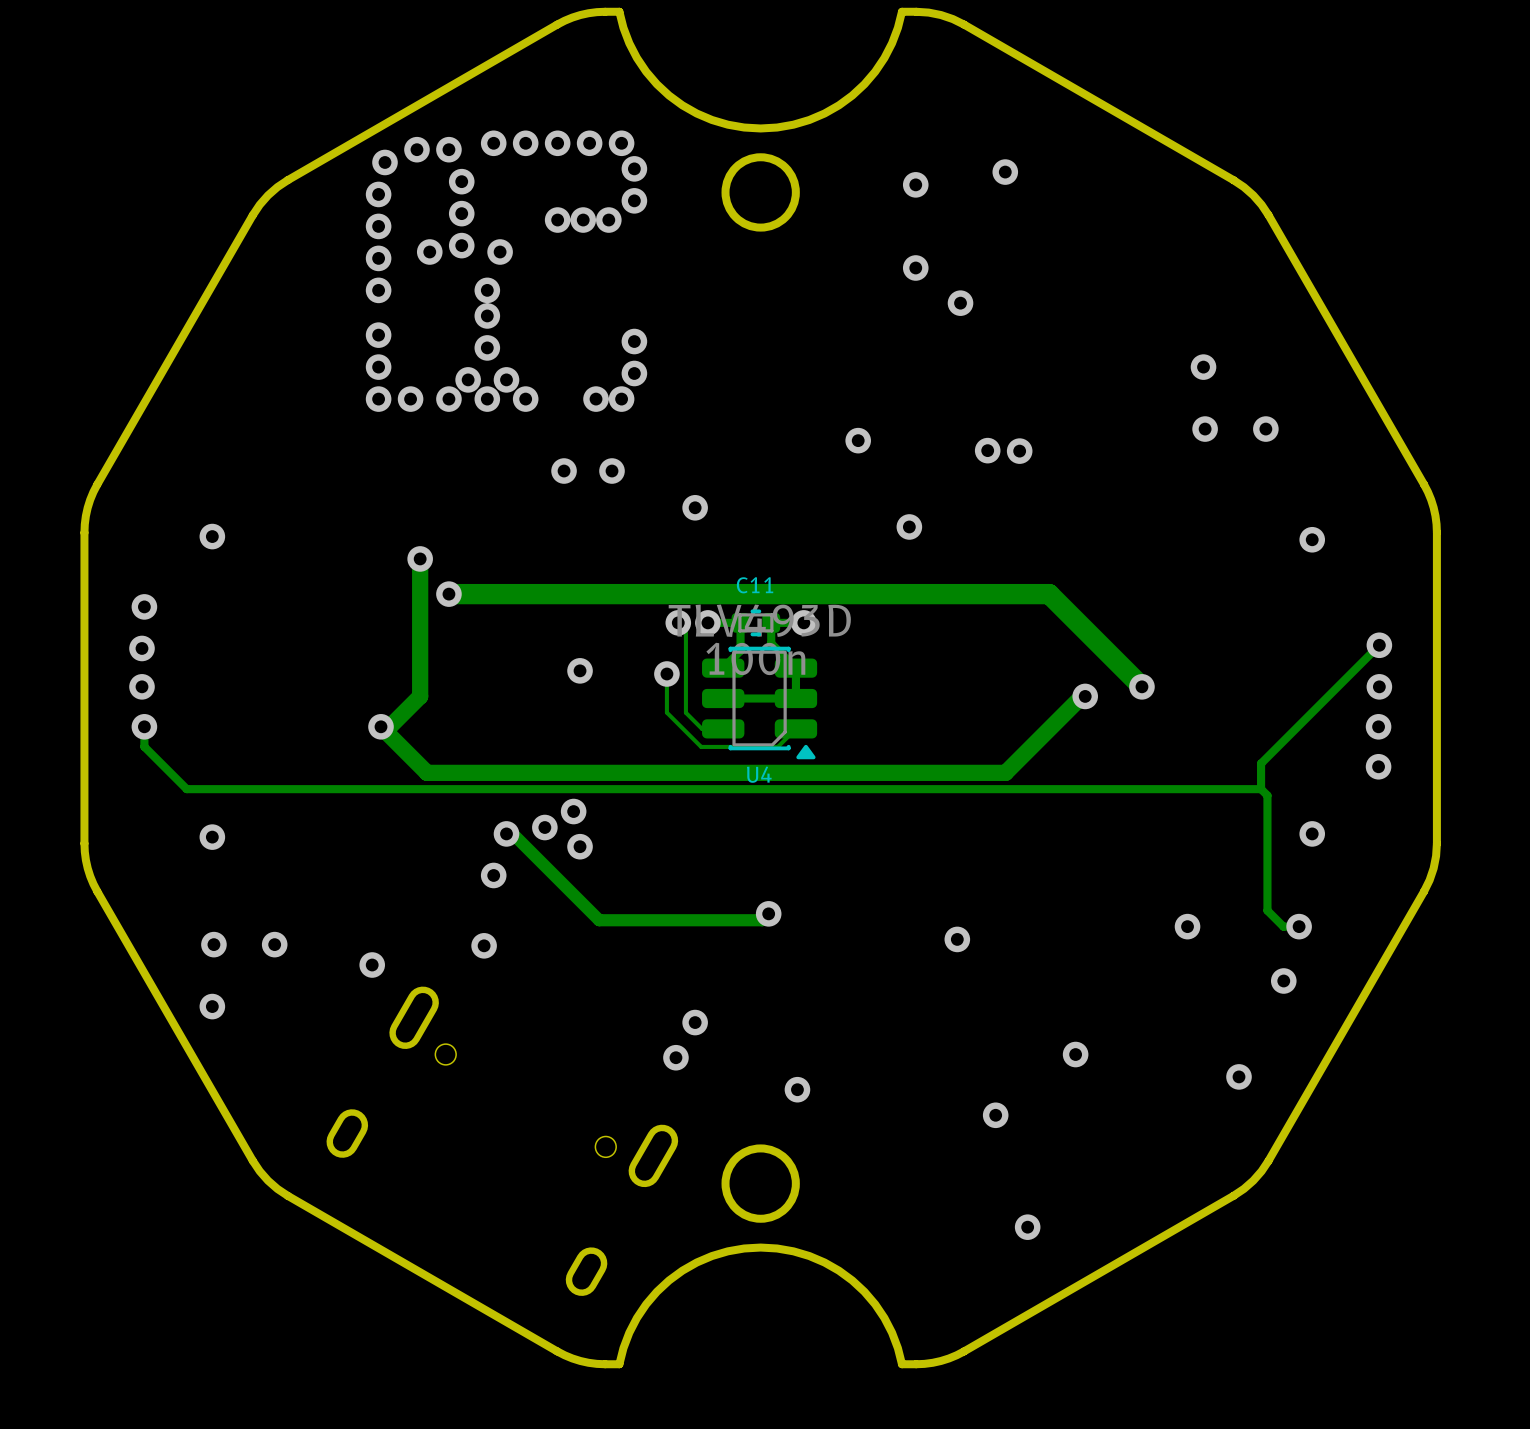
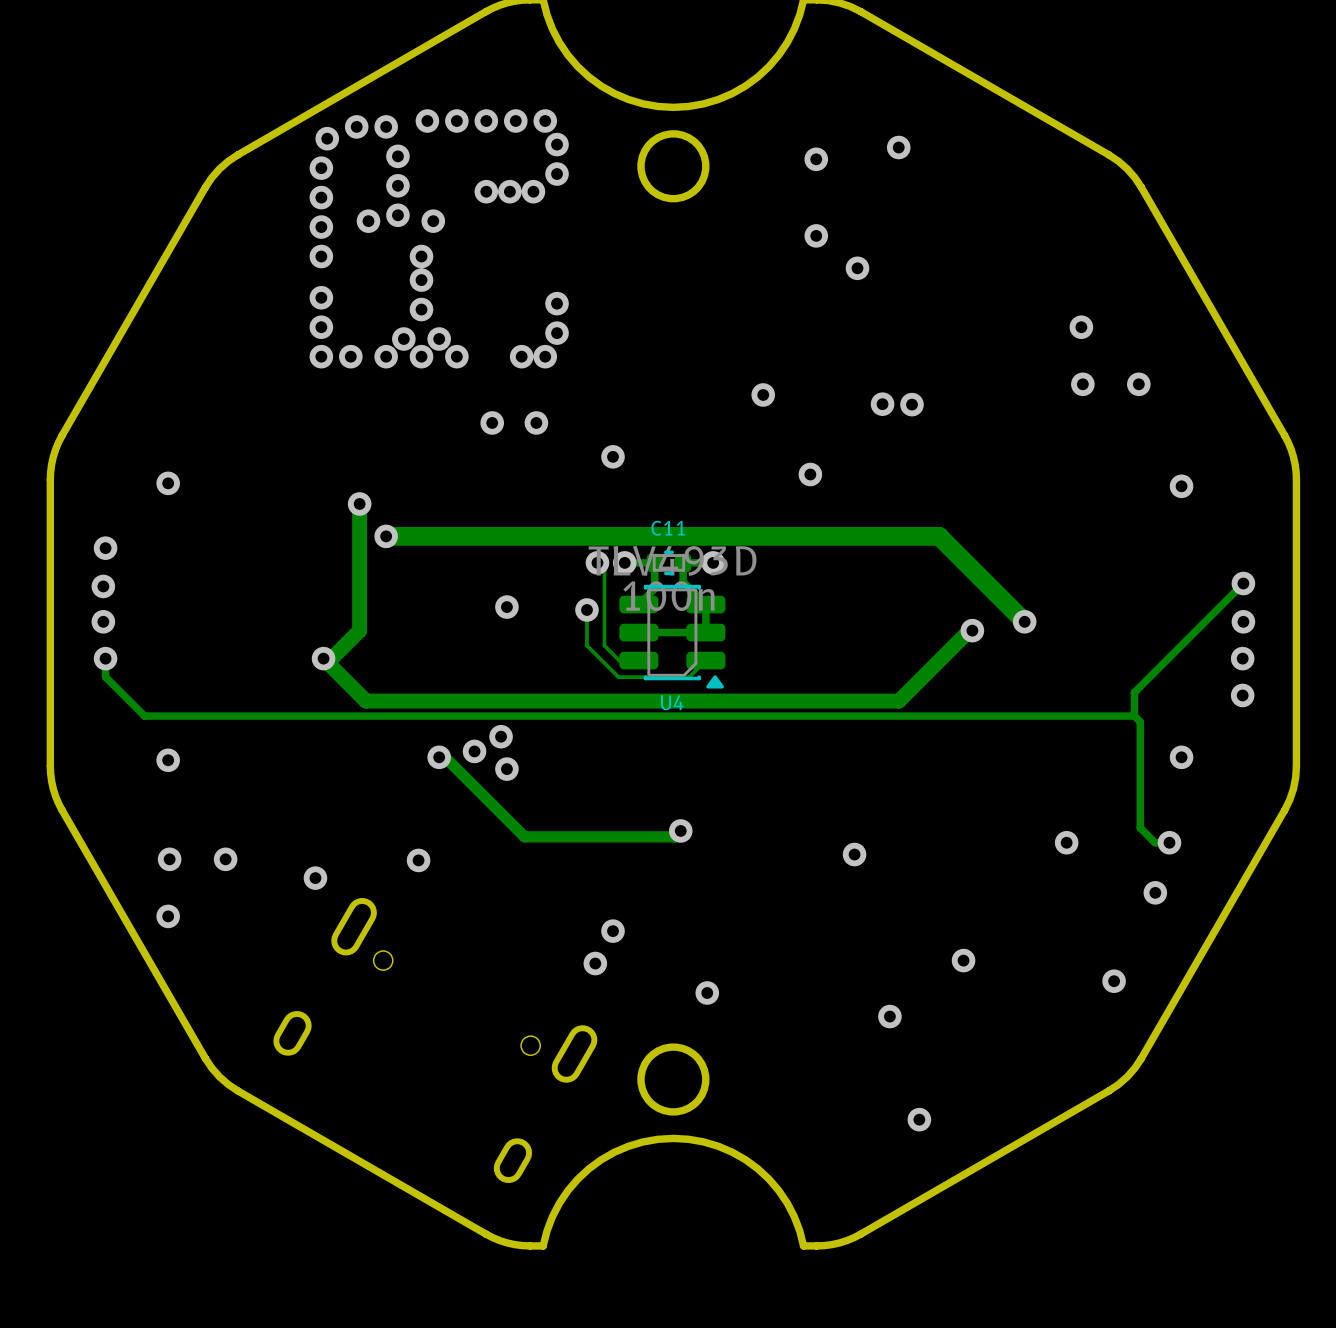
via: (493, 875) -> none

